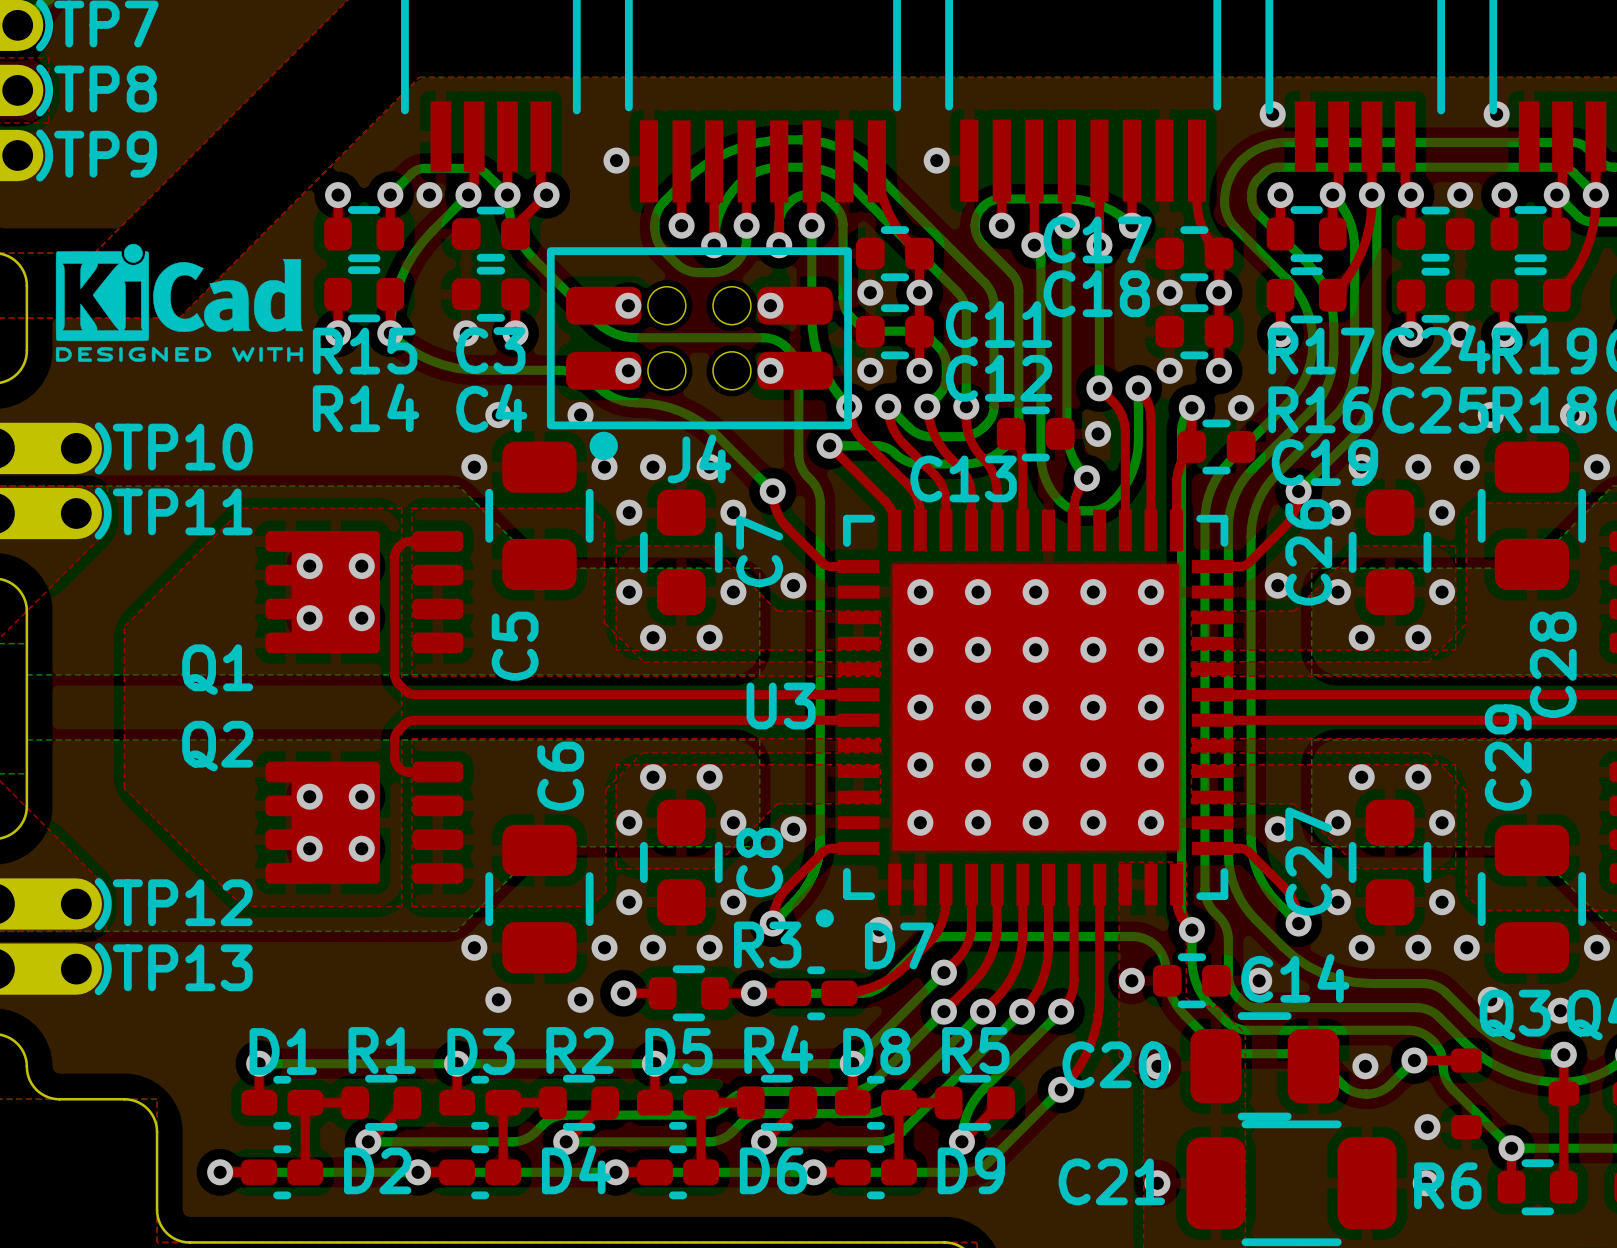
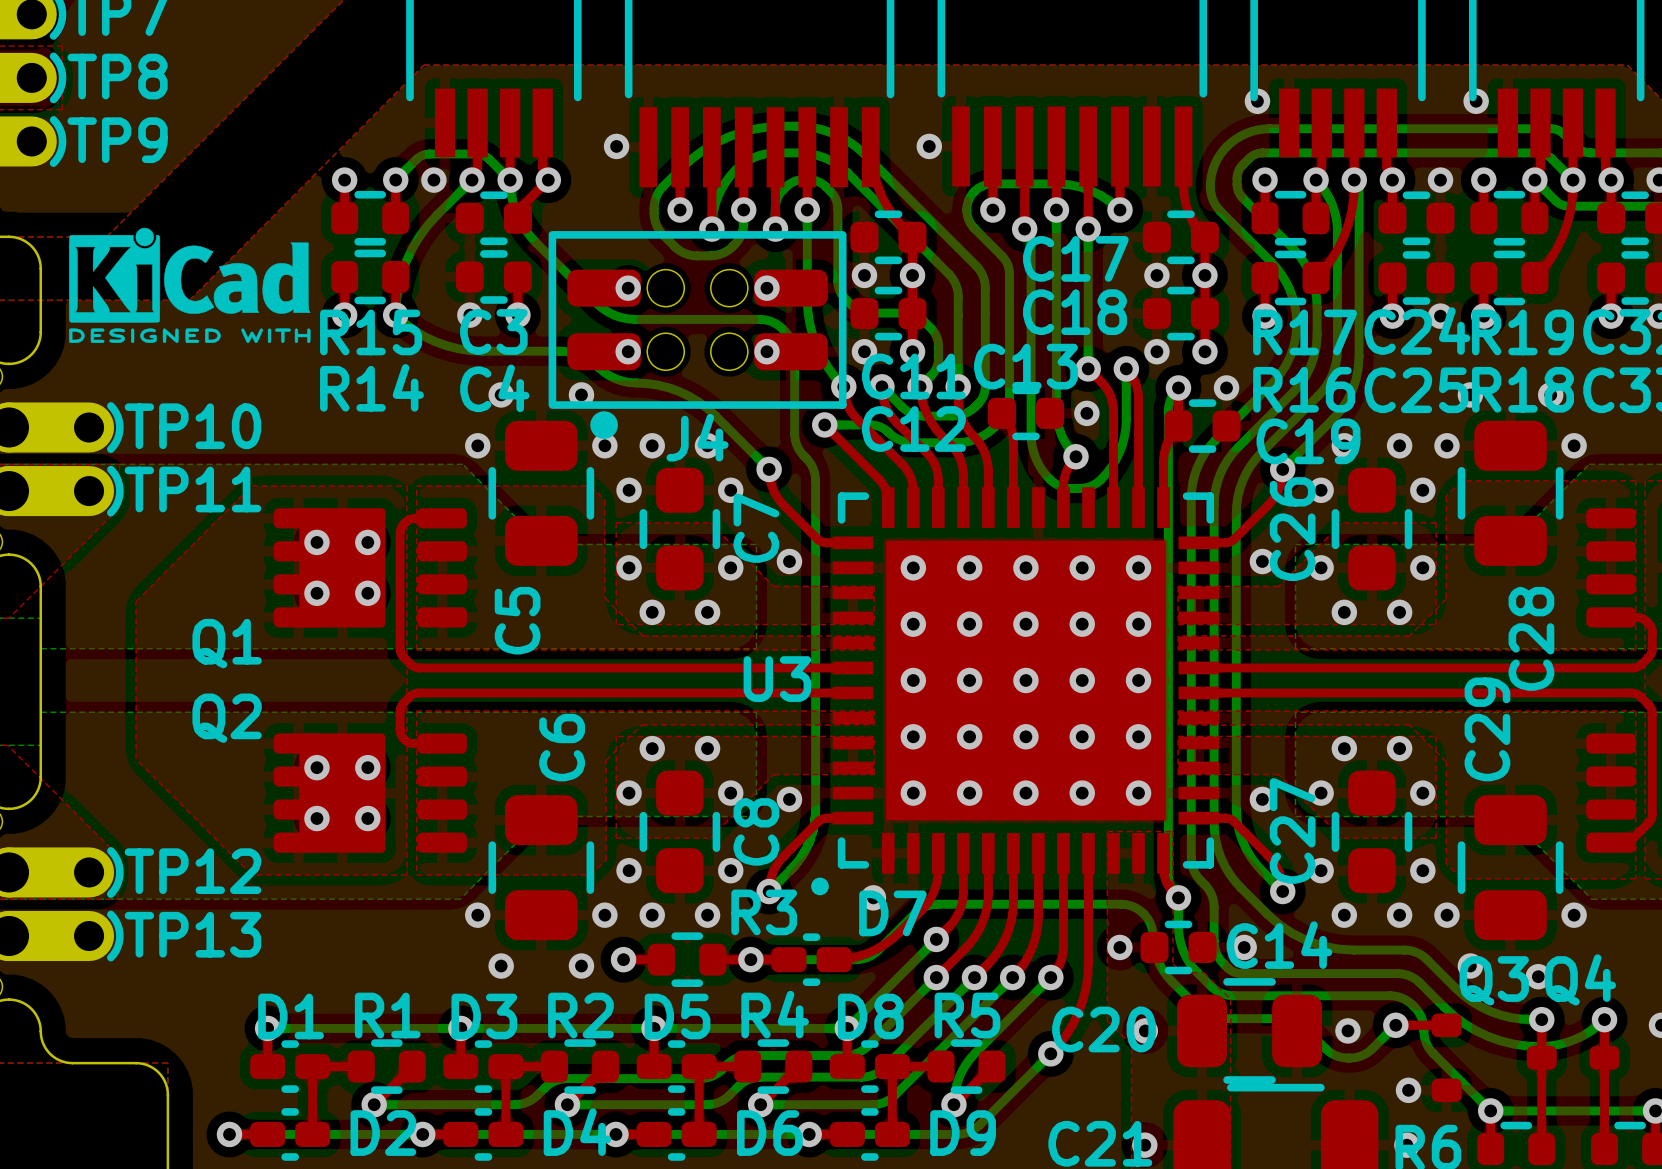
C17 name position: C17 (1097, 239) -> C17 (1075, 258)
C18 name position: C18 (1096, 293) -> C18 (1074, 312)
C11 name position: C11 (999, 324) -> C11 (913, 376)
C12 name position: C12 (999, 378) -> C12 (913, 428)
C13 name position: C13 (963, 478) -> C13 (1025, 366)

